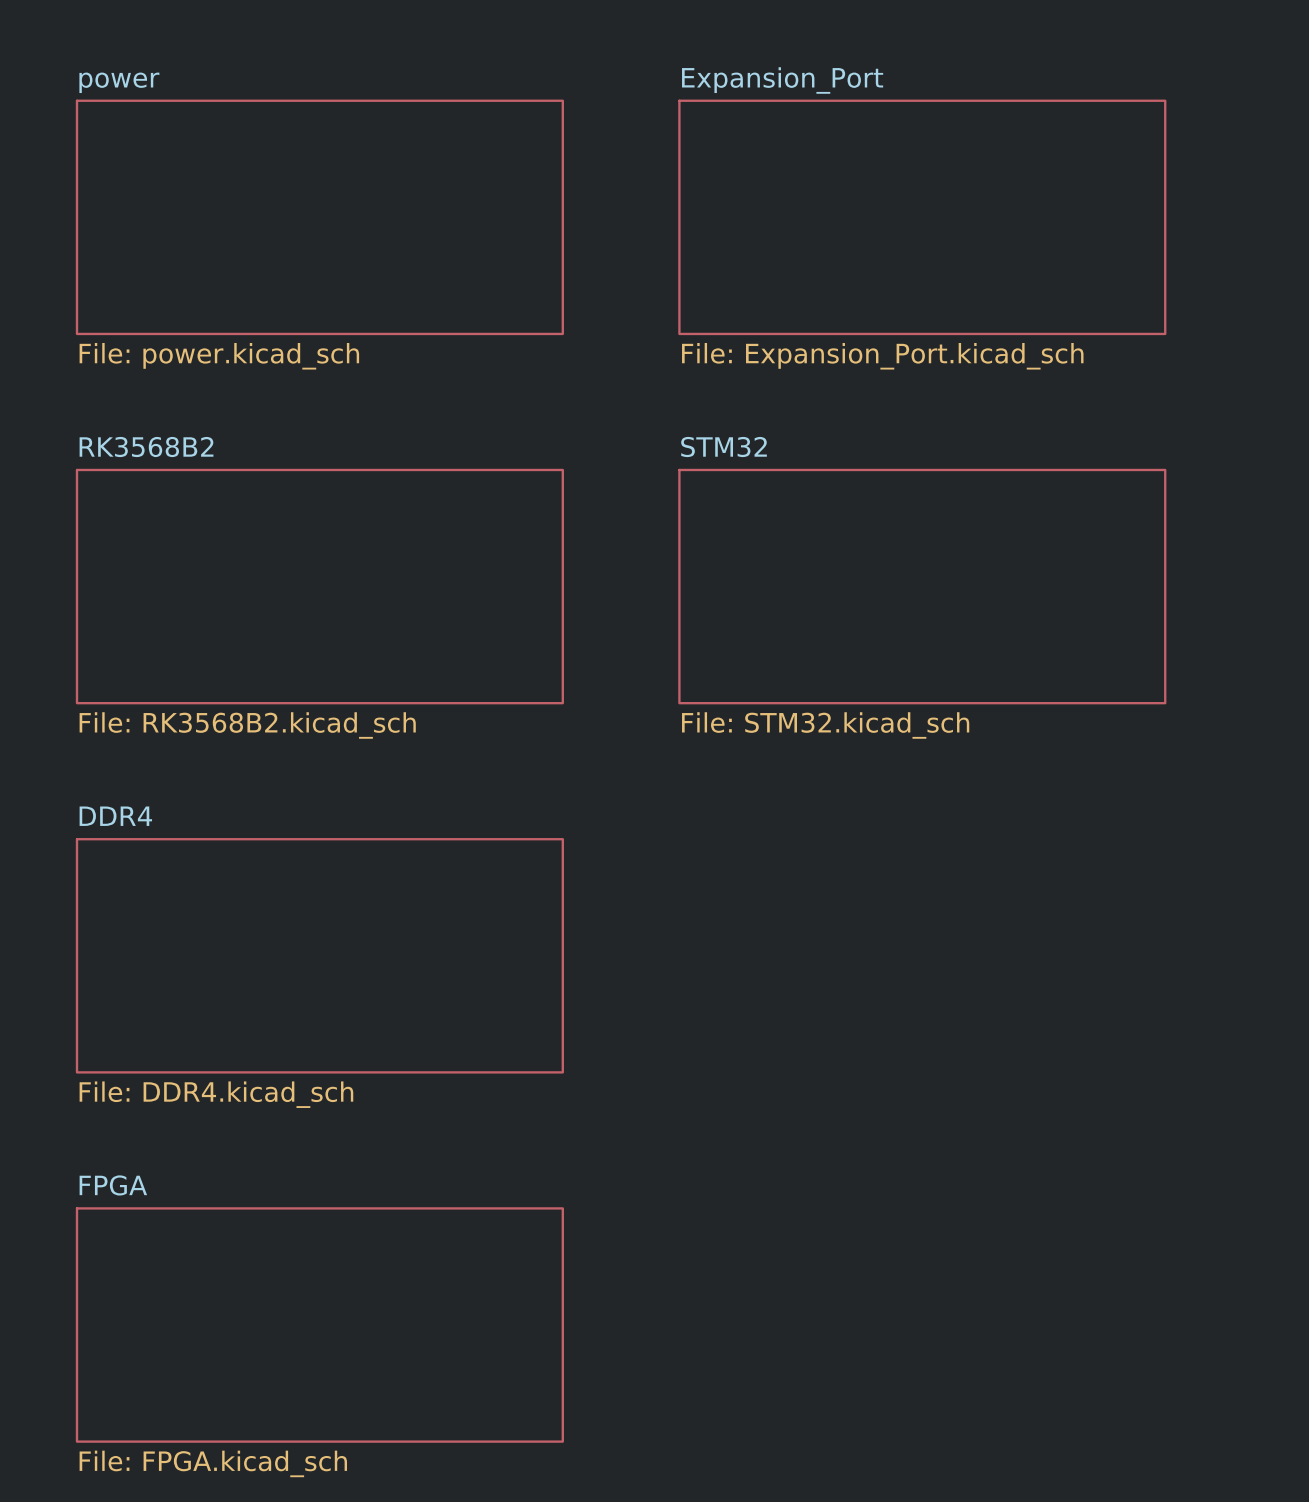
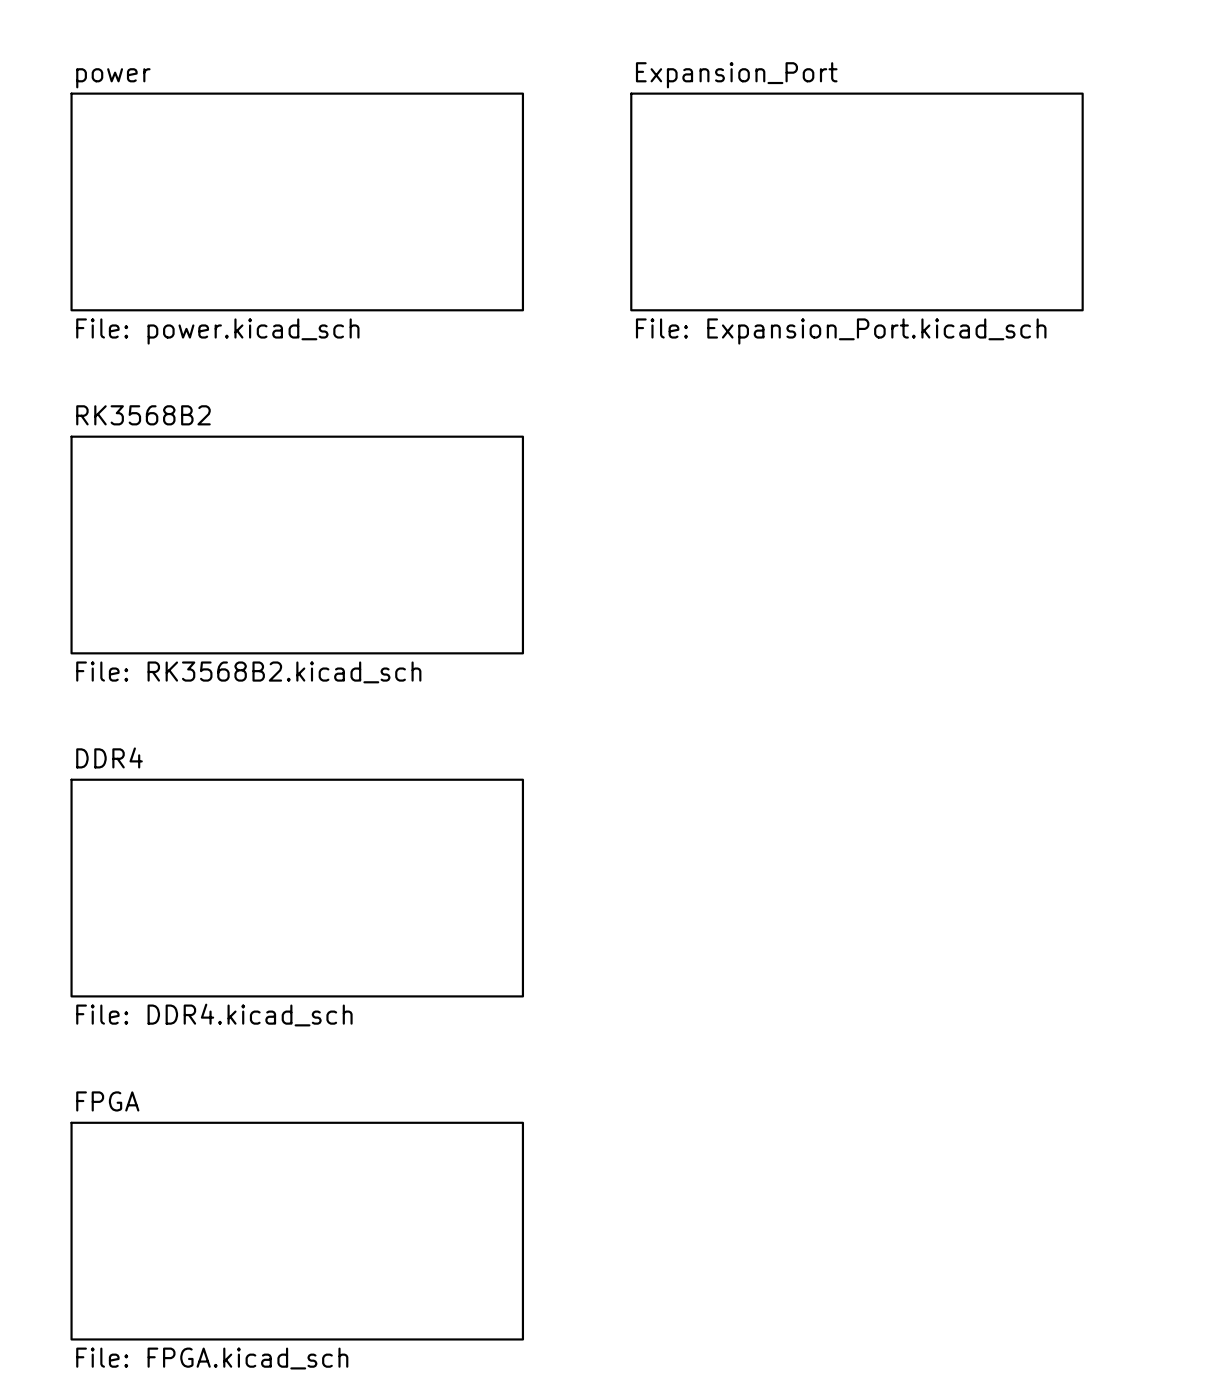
sheet STM32: File: STM32.kicad_sch (922, 586) -> none

